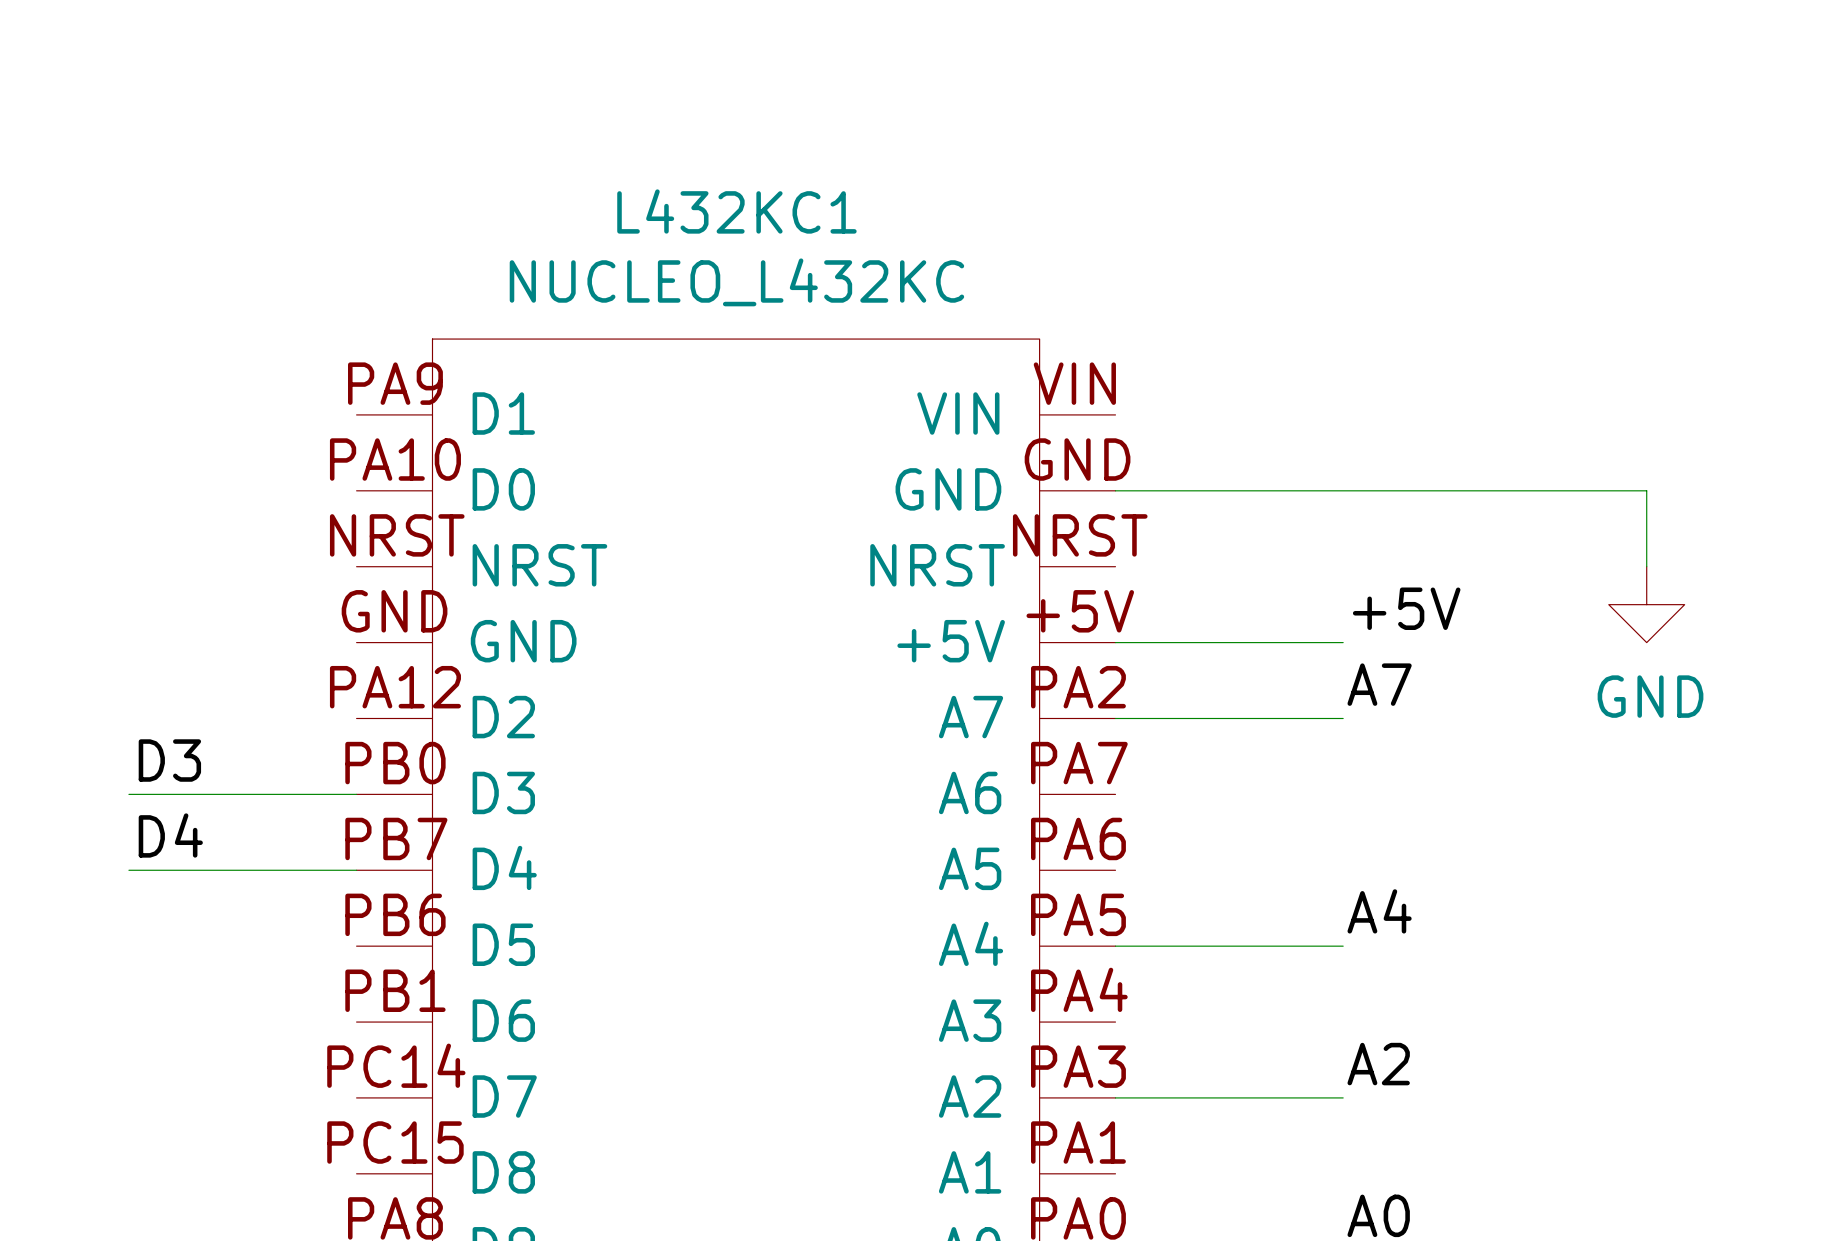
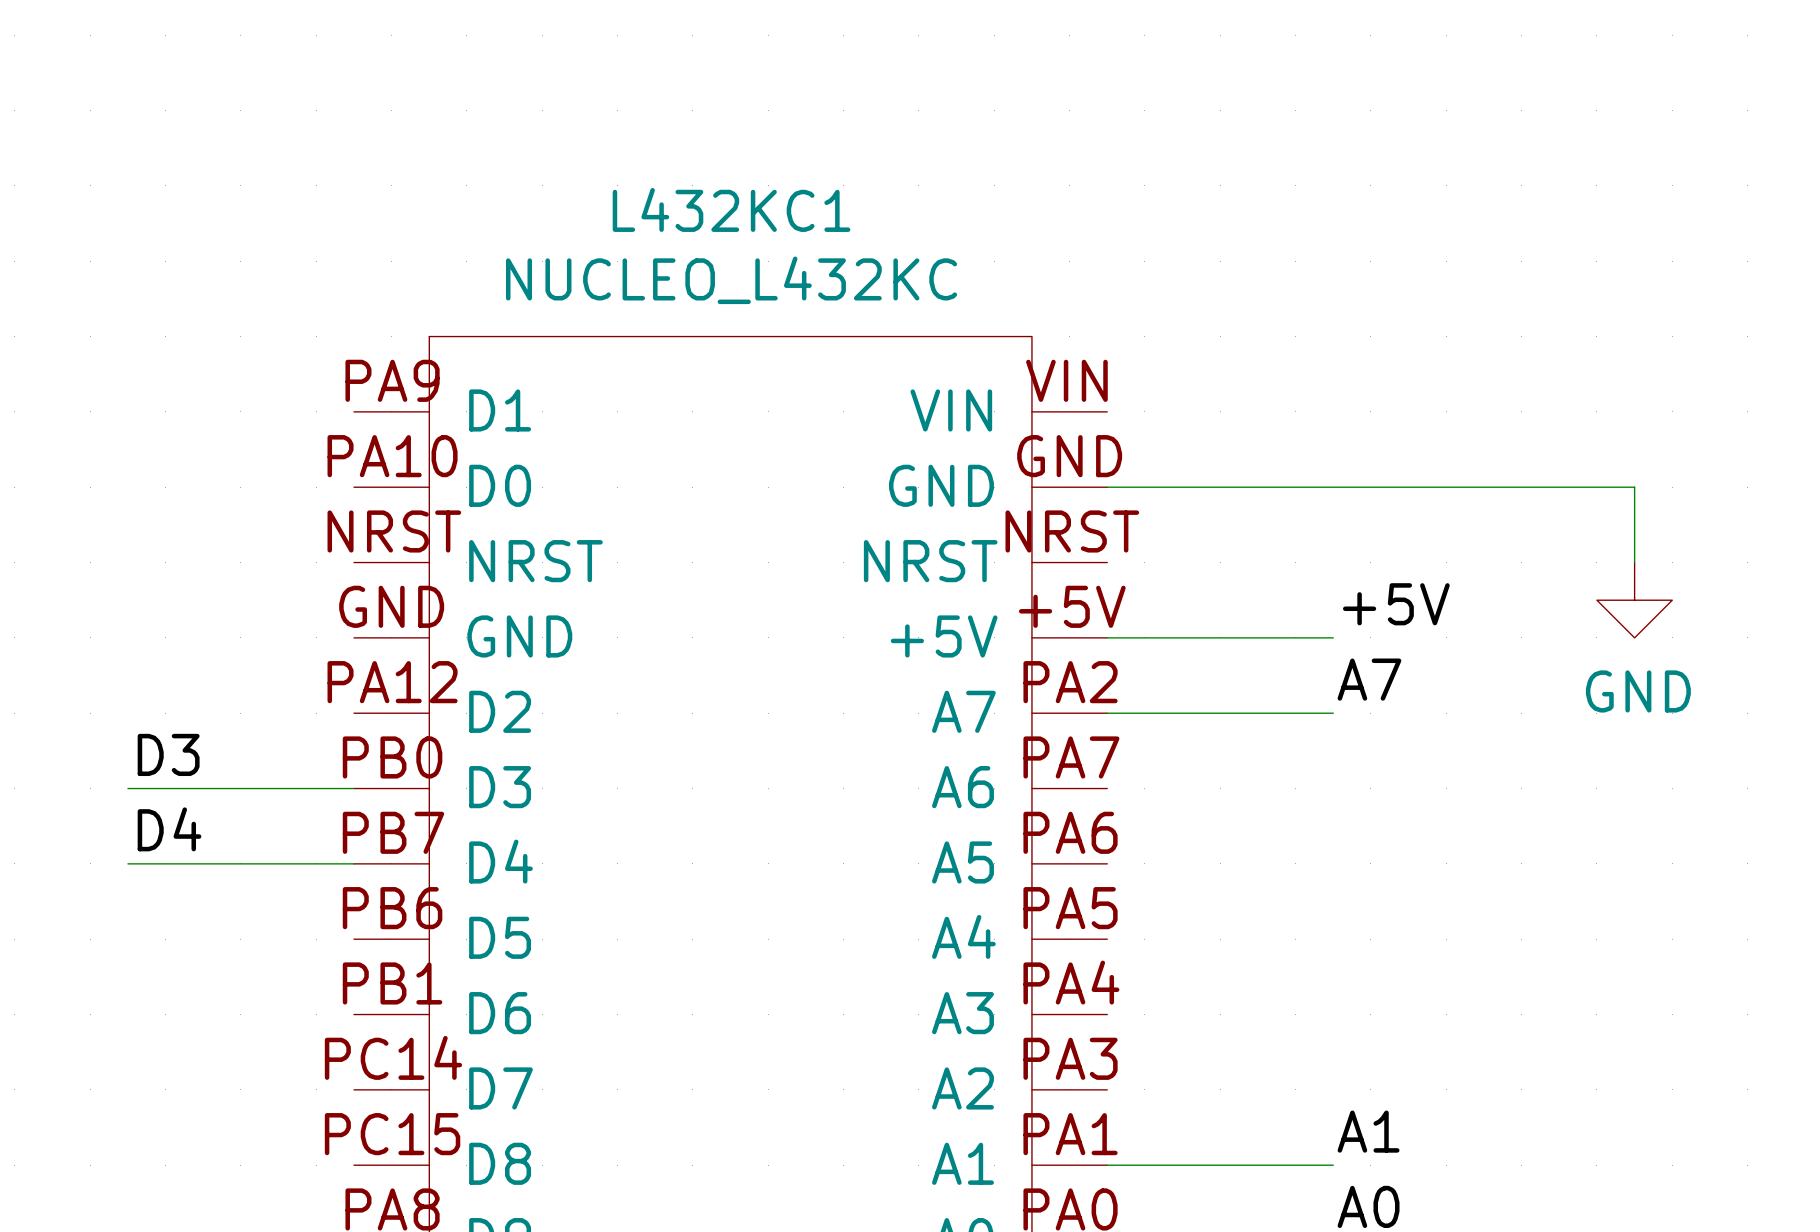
label: A4 (1379, 911) -> none
wire: (1115, 946) (1343, 946) -> none
label: A2 (1378, 1064) -> none
wire: (1115, 1097) (1343, 1097) -> (1107, 1165) (1333, 1165)
label: none -> A1 (1368, 1131)

